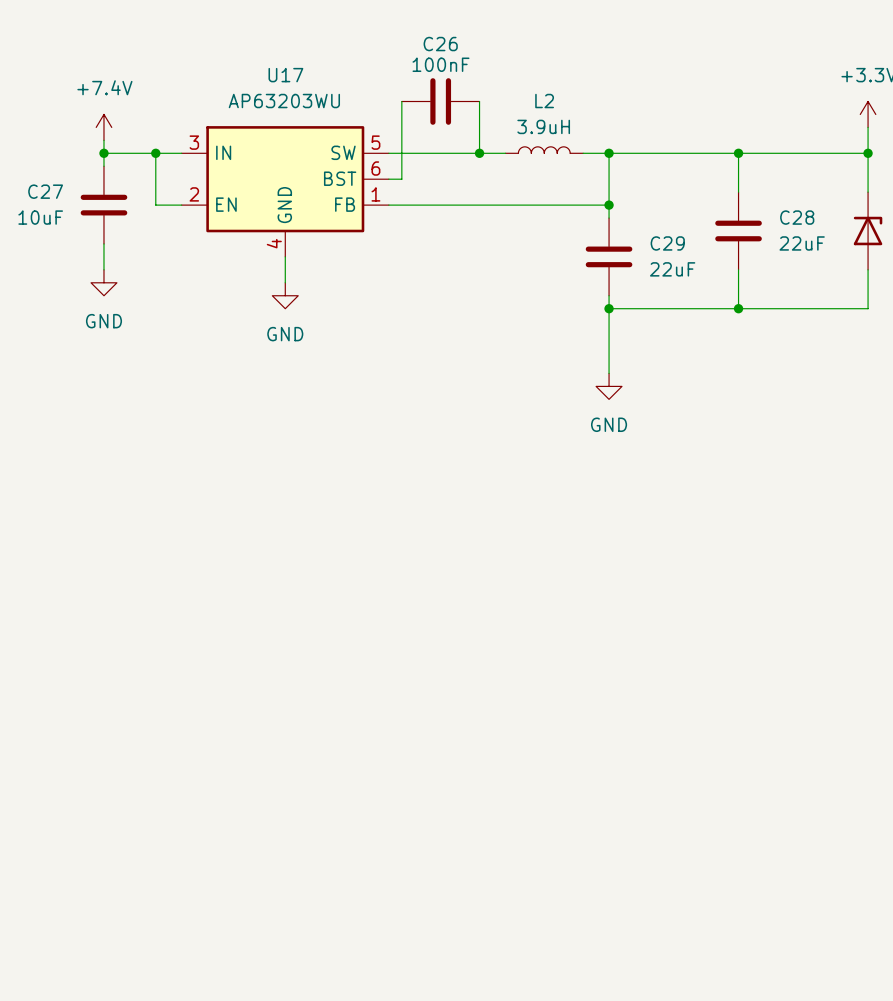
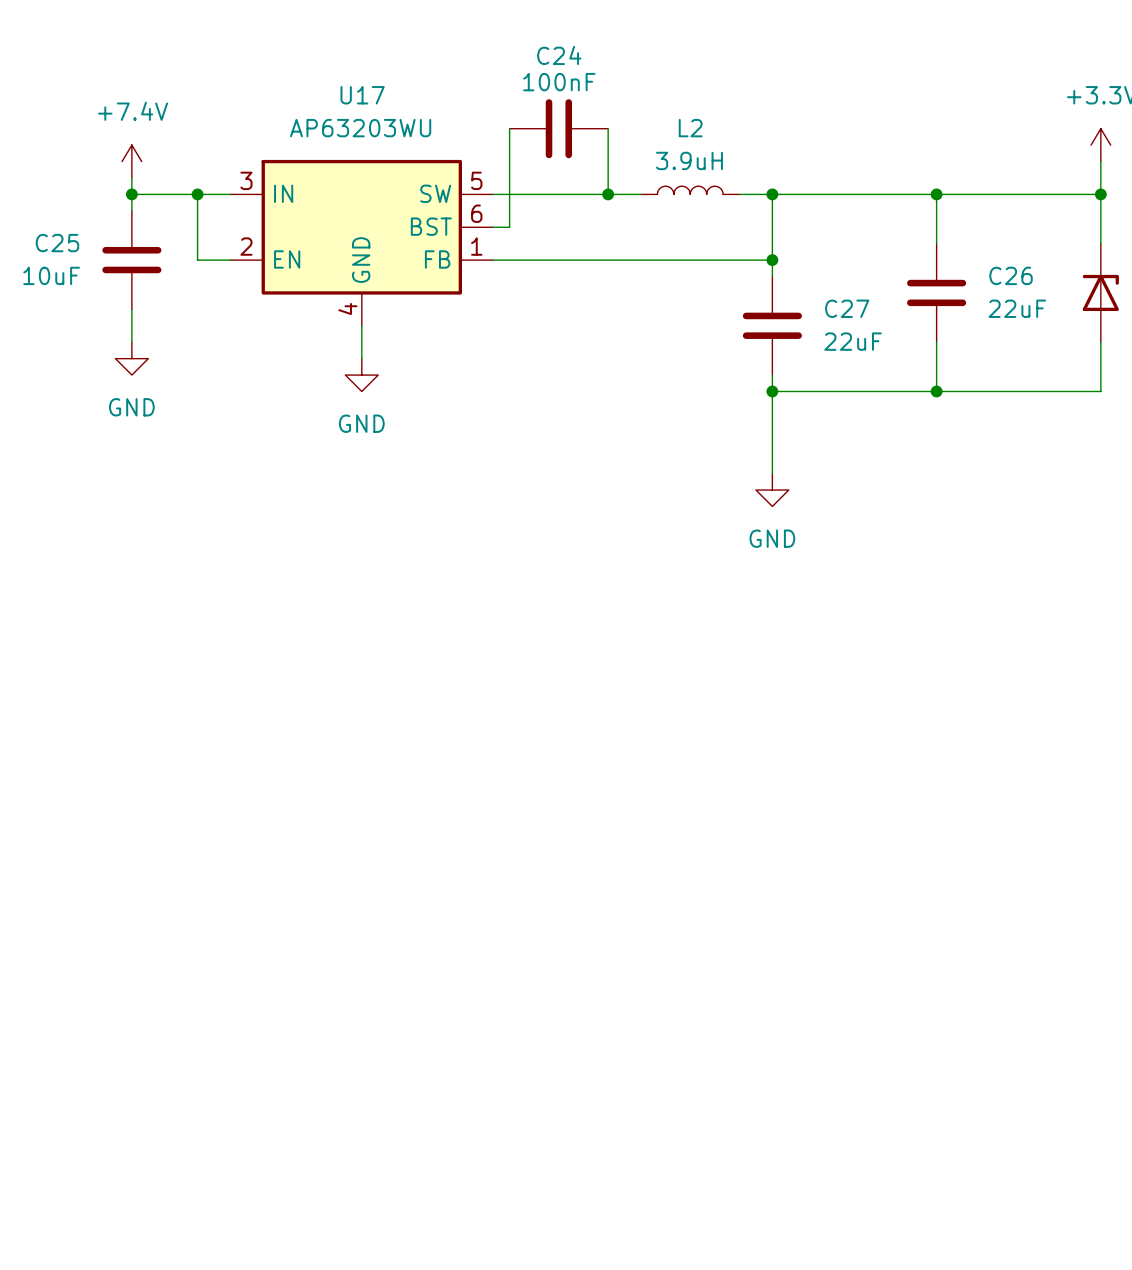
C26 name: C26 (440, 44) -> C24 (559, 55)
C27 name: C27 (45, 191) -> C25 (57, 243)
C28 name: C28 (797, 217) -> C26 (1011, 275)
C29 name: C29 (667, 243) -> C27 (847, 308)

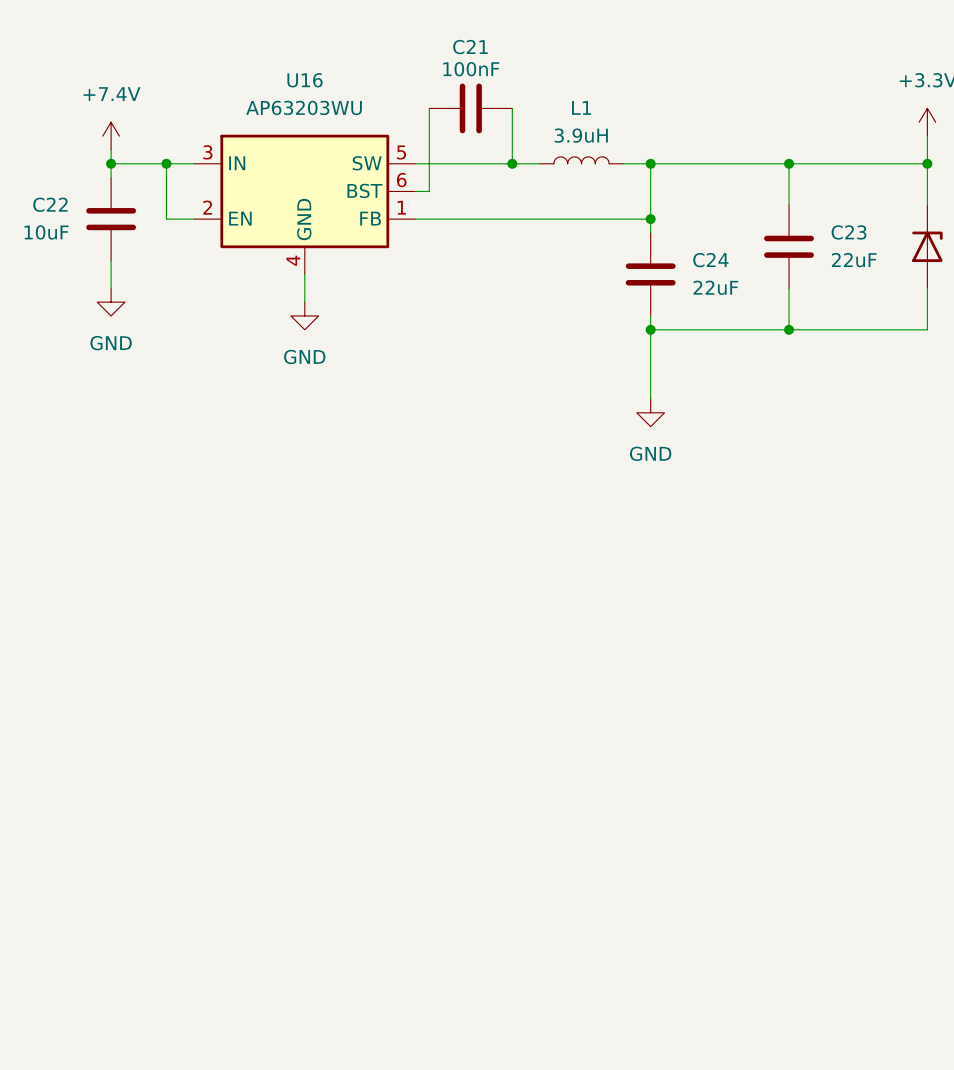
C24 name: C24 (559, 55) -> C21 (470, 47)
U17 name: U17 (362, 95) -> U16 (305, 80)
L2 name: L2 (690, 128) -> L1 (581, 107)
C25 name: C25 (57, 243) -> C22 (50, 204)
C26 name: C26 (1011, 275) -> C23 (849, 232)
C27 name: C27 (847, 308) -> C24 (710, 260)

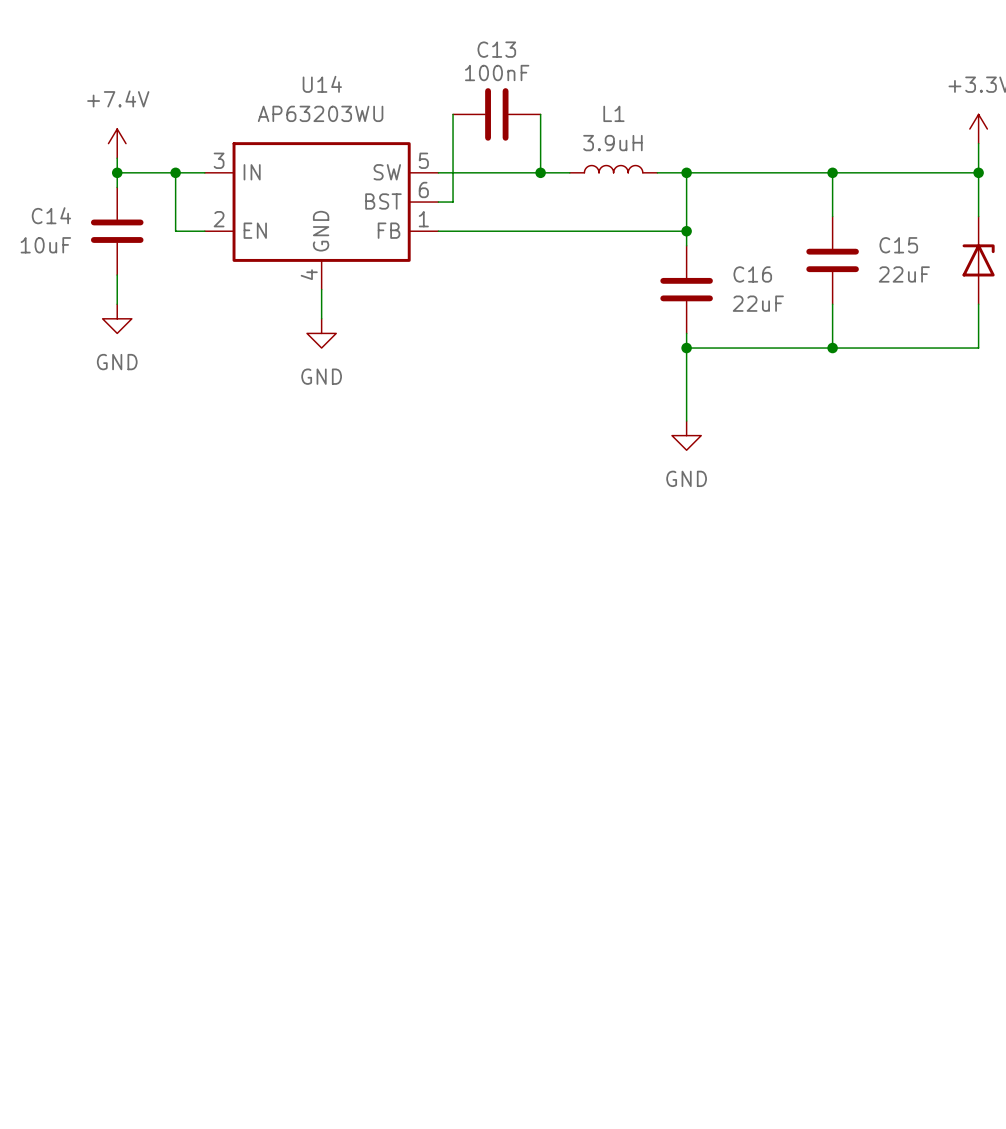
C21 name: C21 (470, 47) -> C13 (496, 49)
U16 name: U16 (305, 80) -> U14 (322, 84)
C22 name: C22 (50, 204) -> C14 (51, 215)
C23 name: C23 (849, 232) -> C15 (898, 245)
C24 name: C24 (710, 260) -> C16 (752, 274)

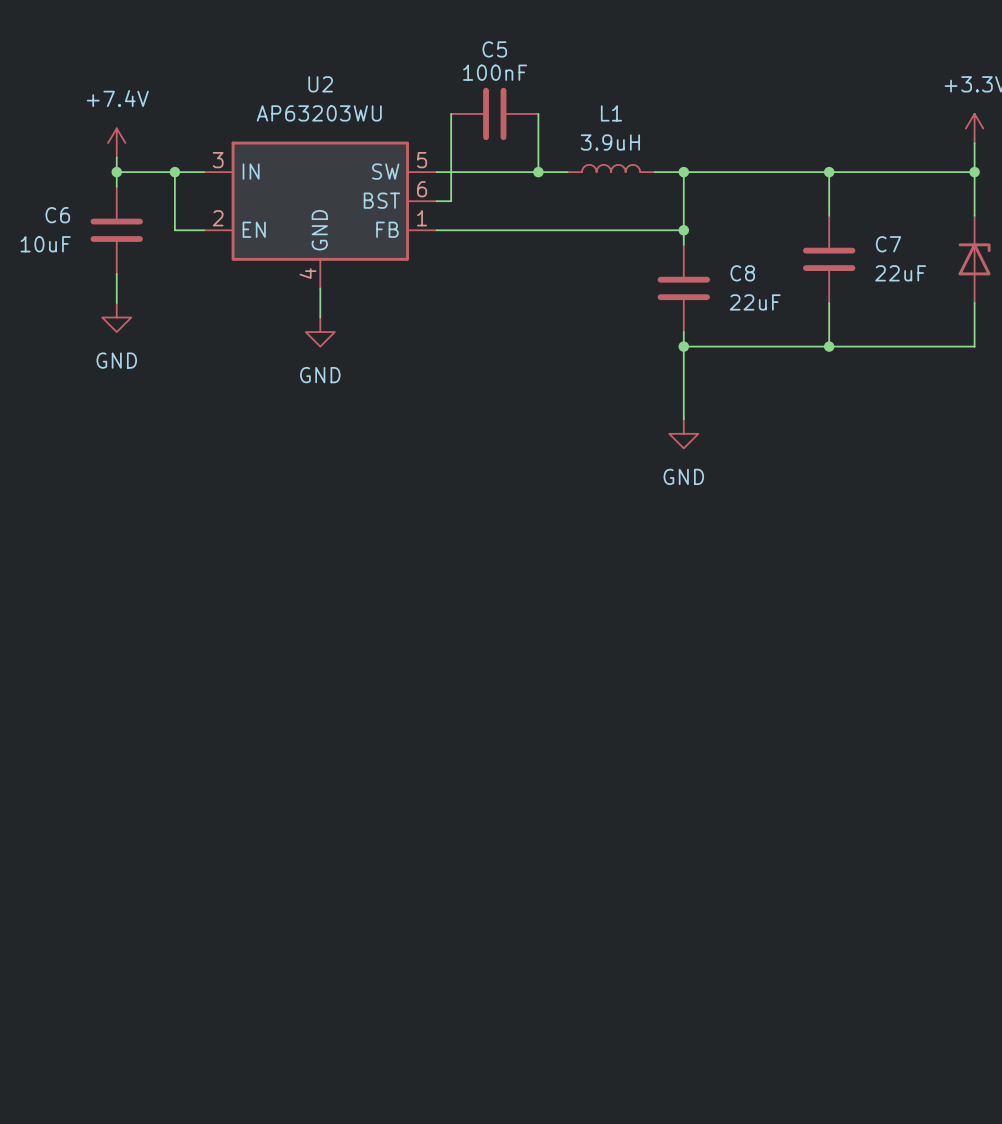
C13 name: C13 (496, 49) -> C5 (494, 49)
U14 name: U14 (322, 84) -> U2 (320, 84)
C14 name: C14 (51, 215) -> C6 (57, 215)
C15 name: C15 (898, 245) -> C7 (888, 244)
C16 name: C16 (752, 274) -> C8 (742, 273)

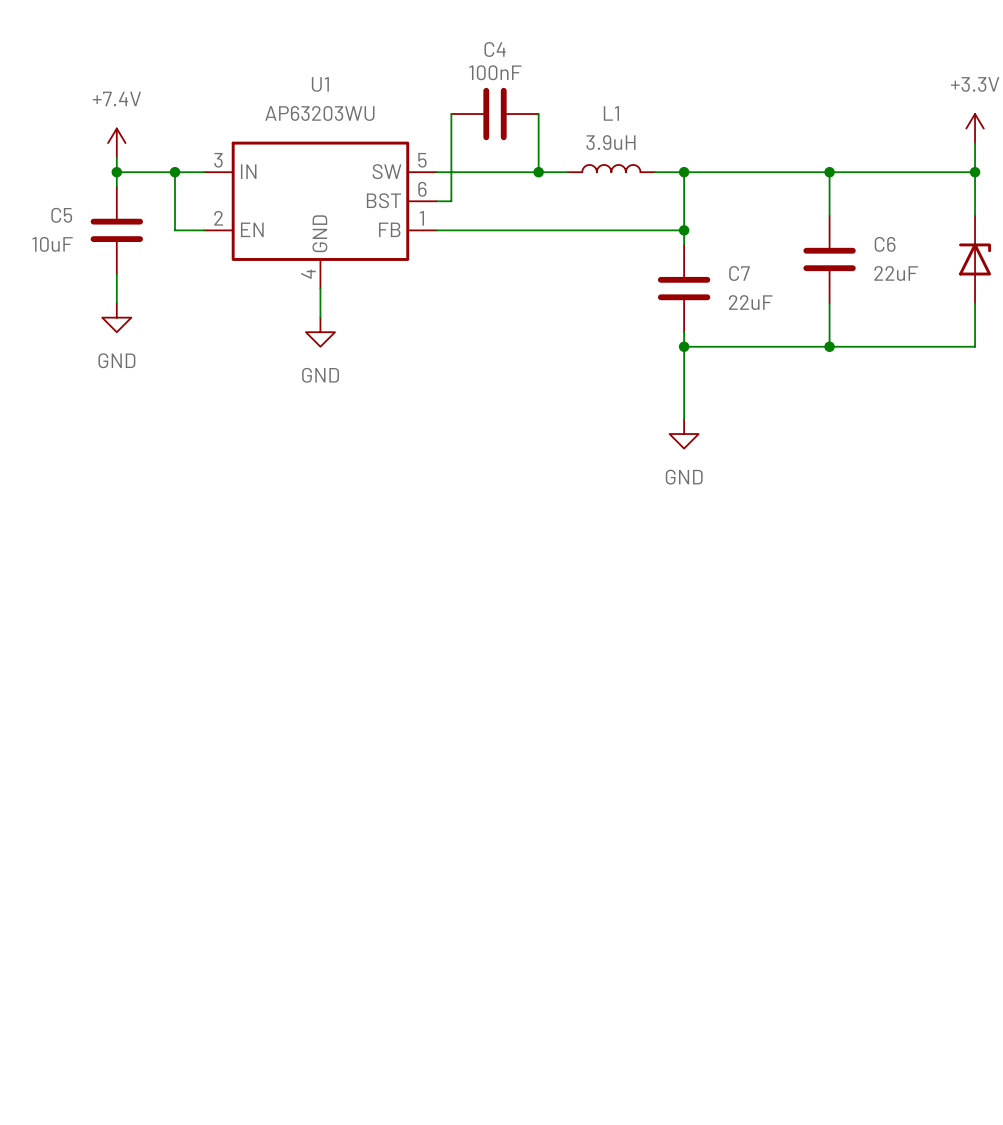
C5 name: C5 (494, 49) -> C4 (495, 49)
U2 name: U2 (320, 84) -> U1 (320, 84)
C6 name: C6 (57, 215) -> C5 (61, 215)
C7 name: C7 (888, 244) -> C6 (885, 244)
C8 name: C8 (742, 273) -> C7 (739, 273)

